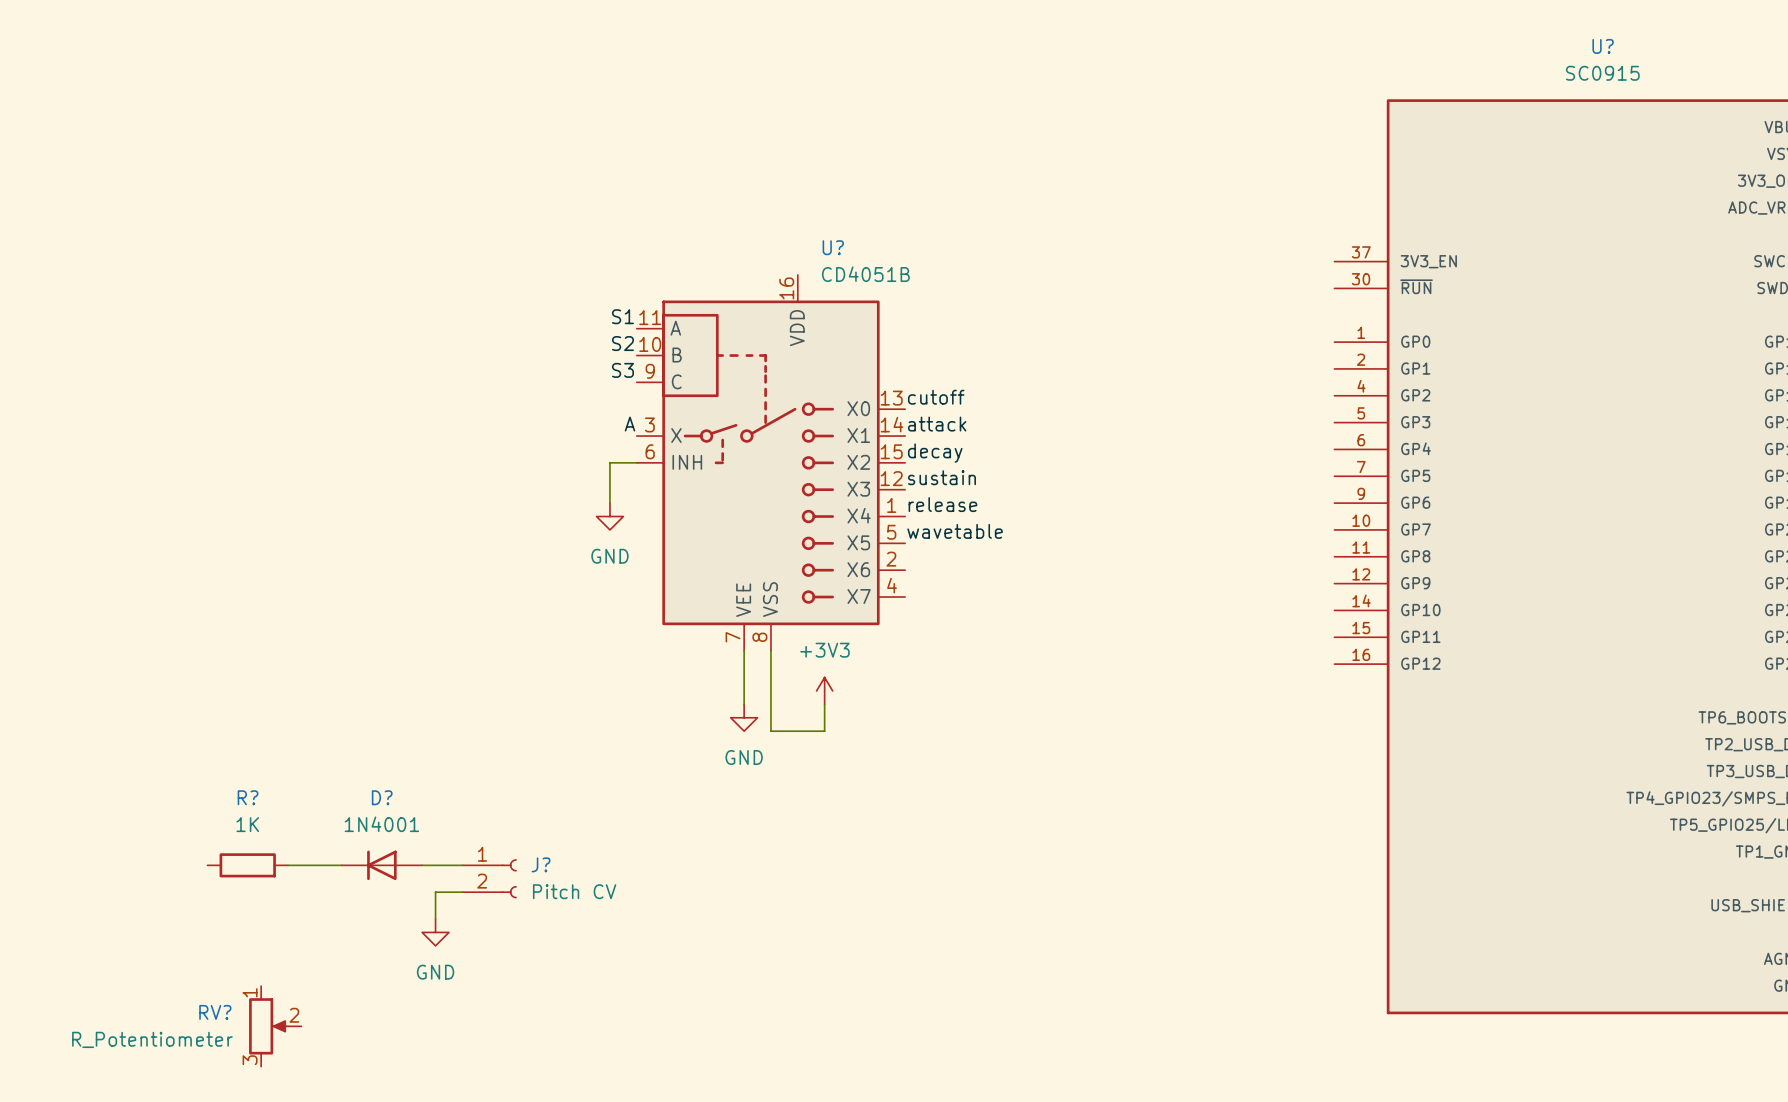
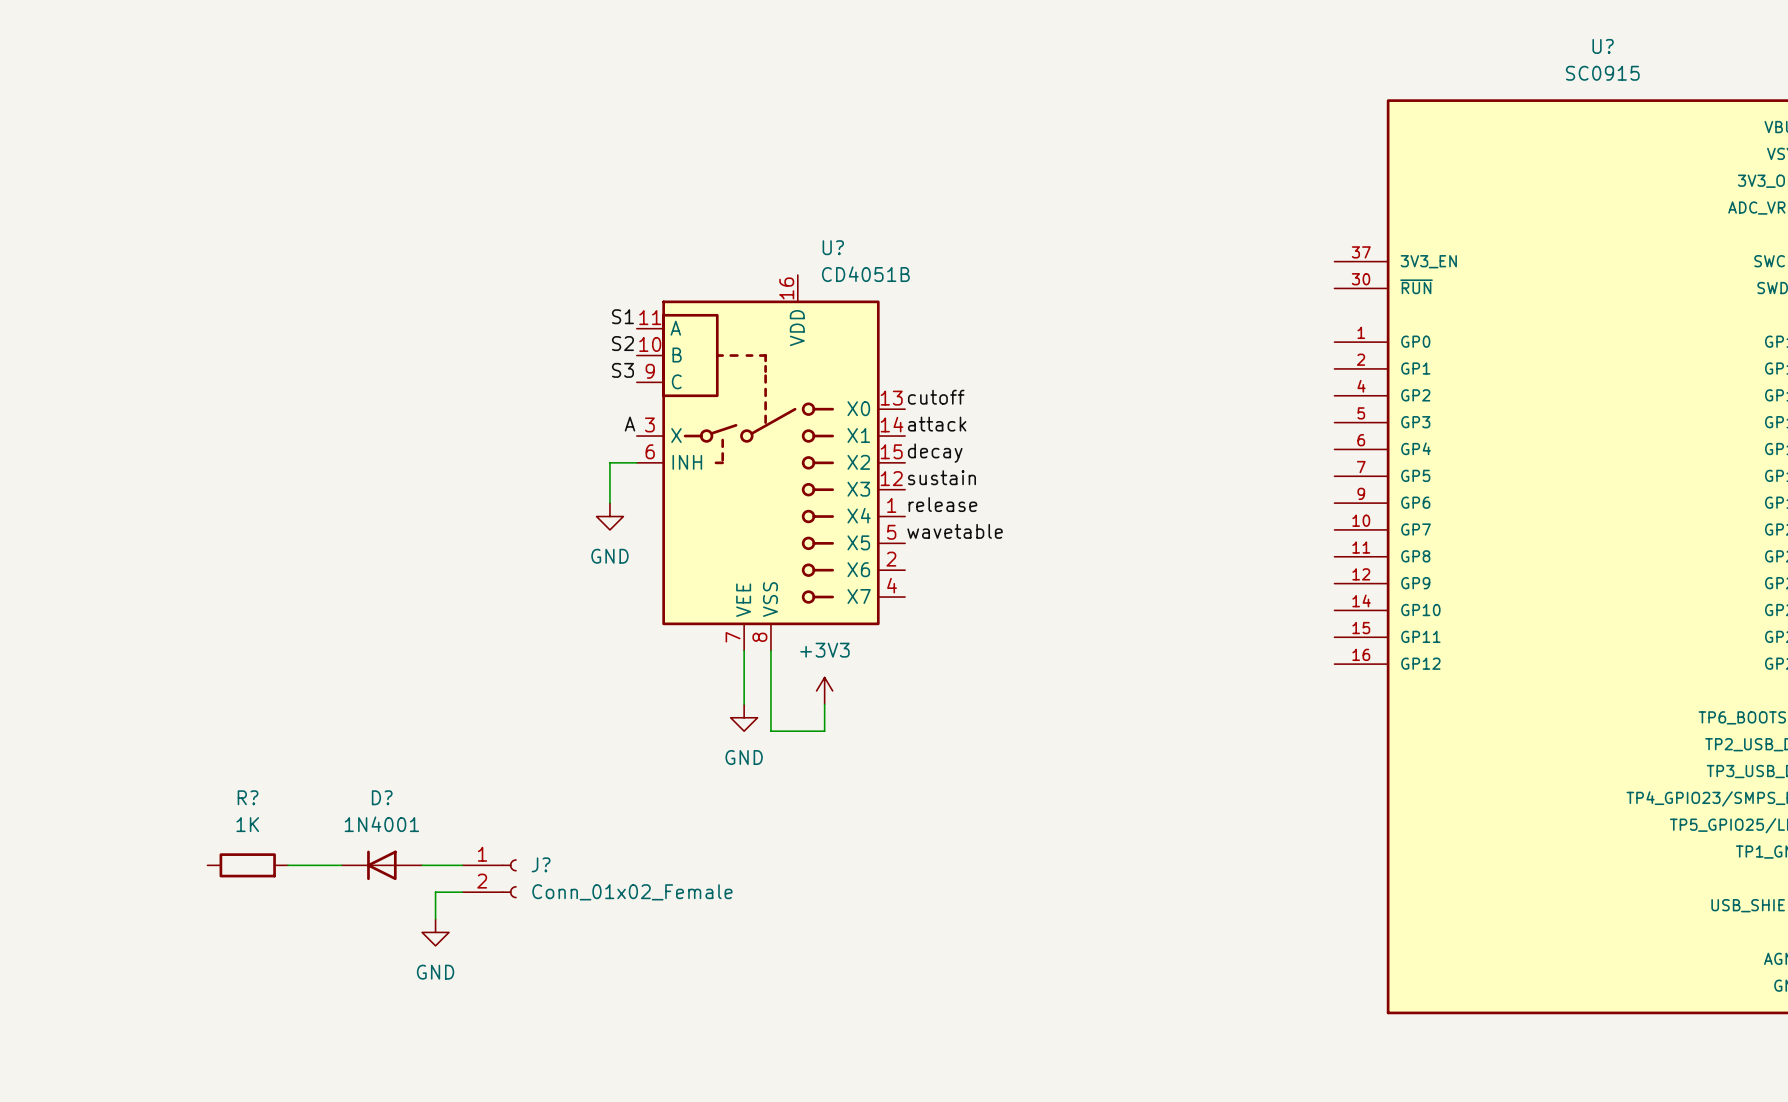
J? value: Pitch CV (574, 891) -> Conn_01x02_Female (632, 892)
RV?: R_Potentiometer (275, 1026) -> none

